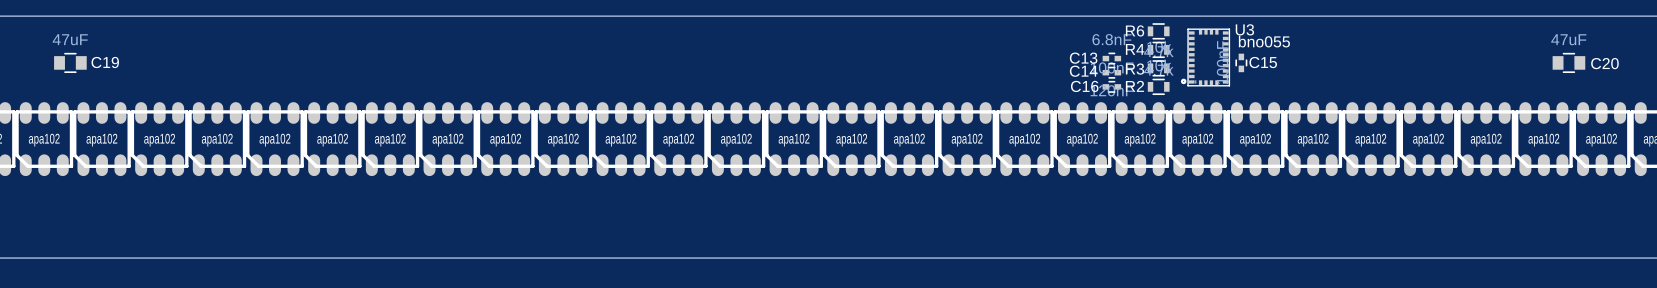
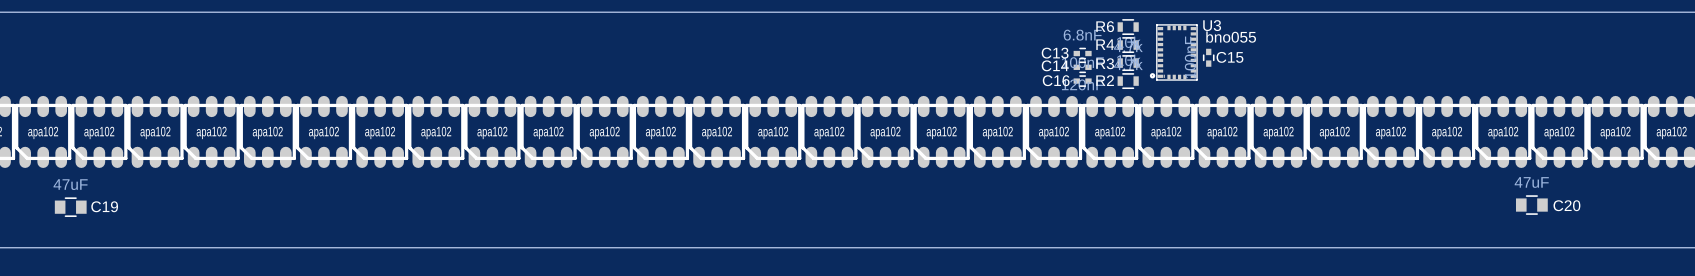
C19 position: (70, 62) -> (70, 207)
C20 position: (1568, 62) -> (1531, 205)

